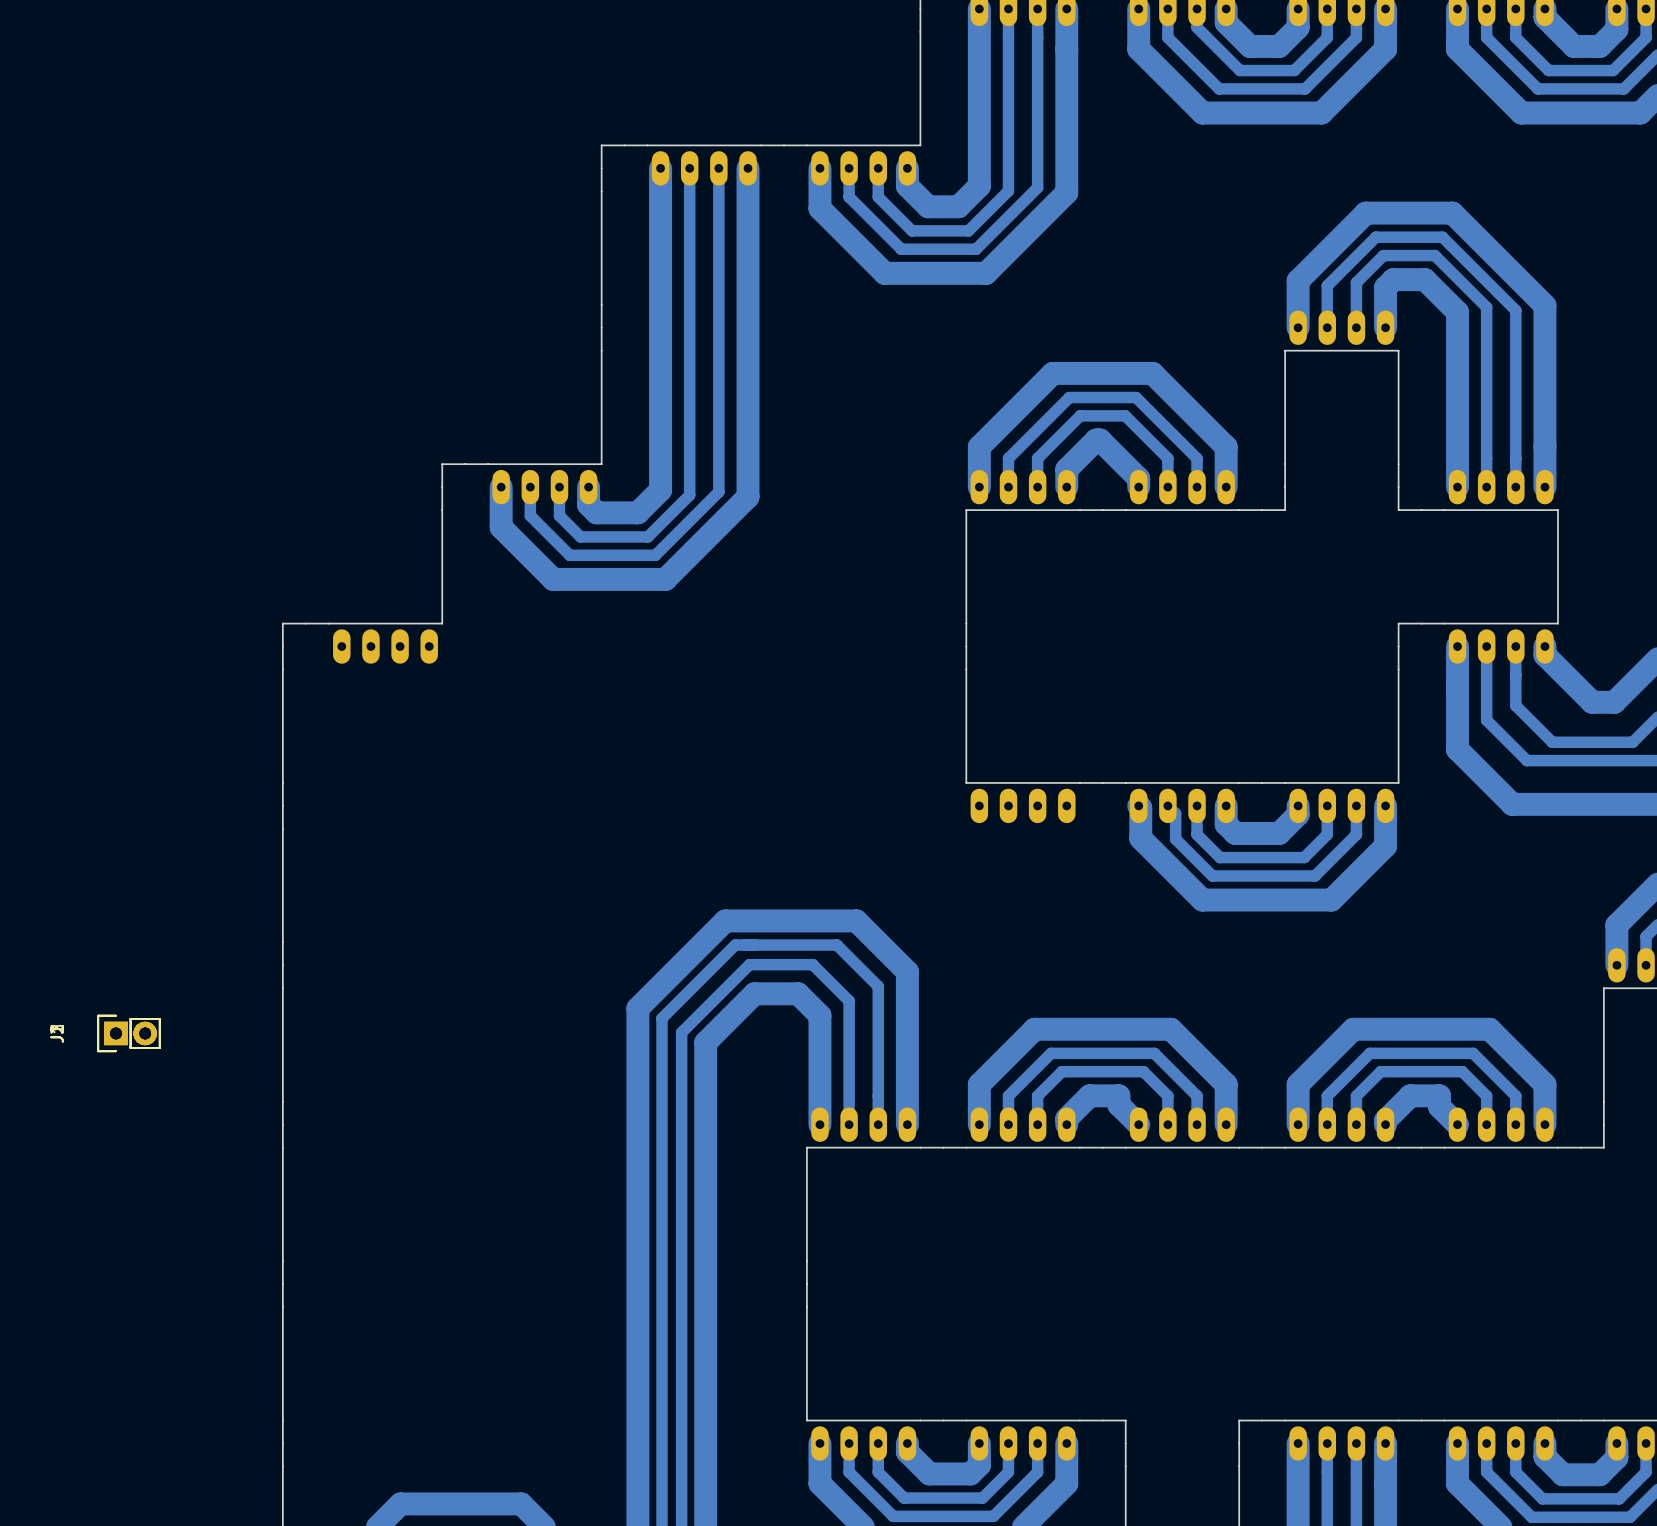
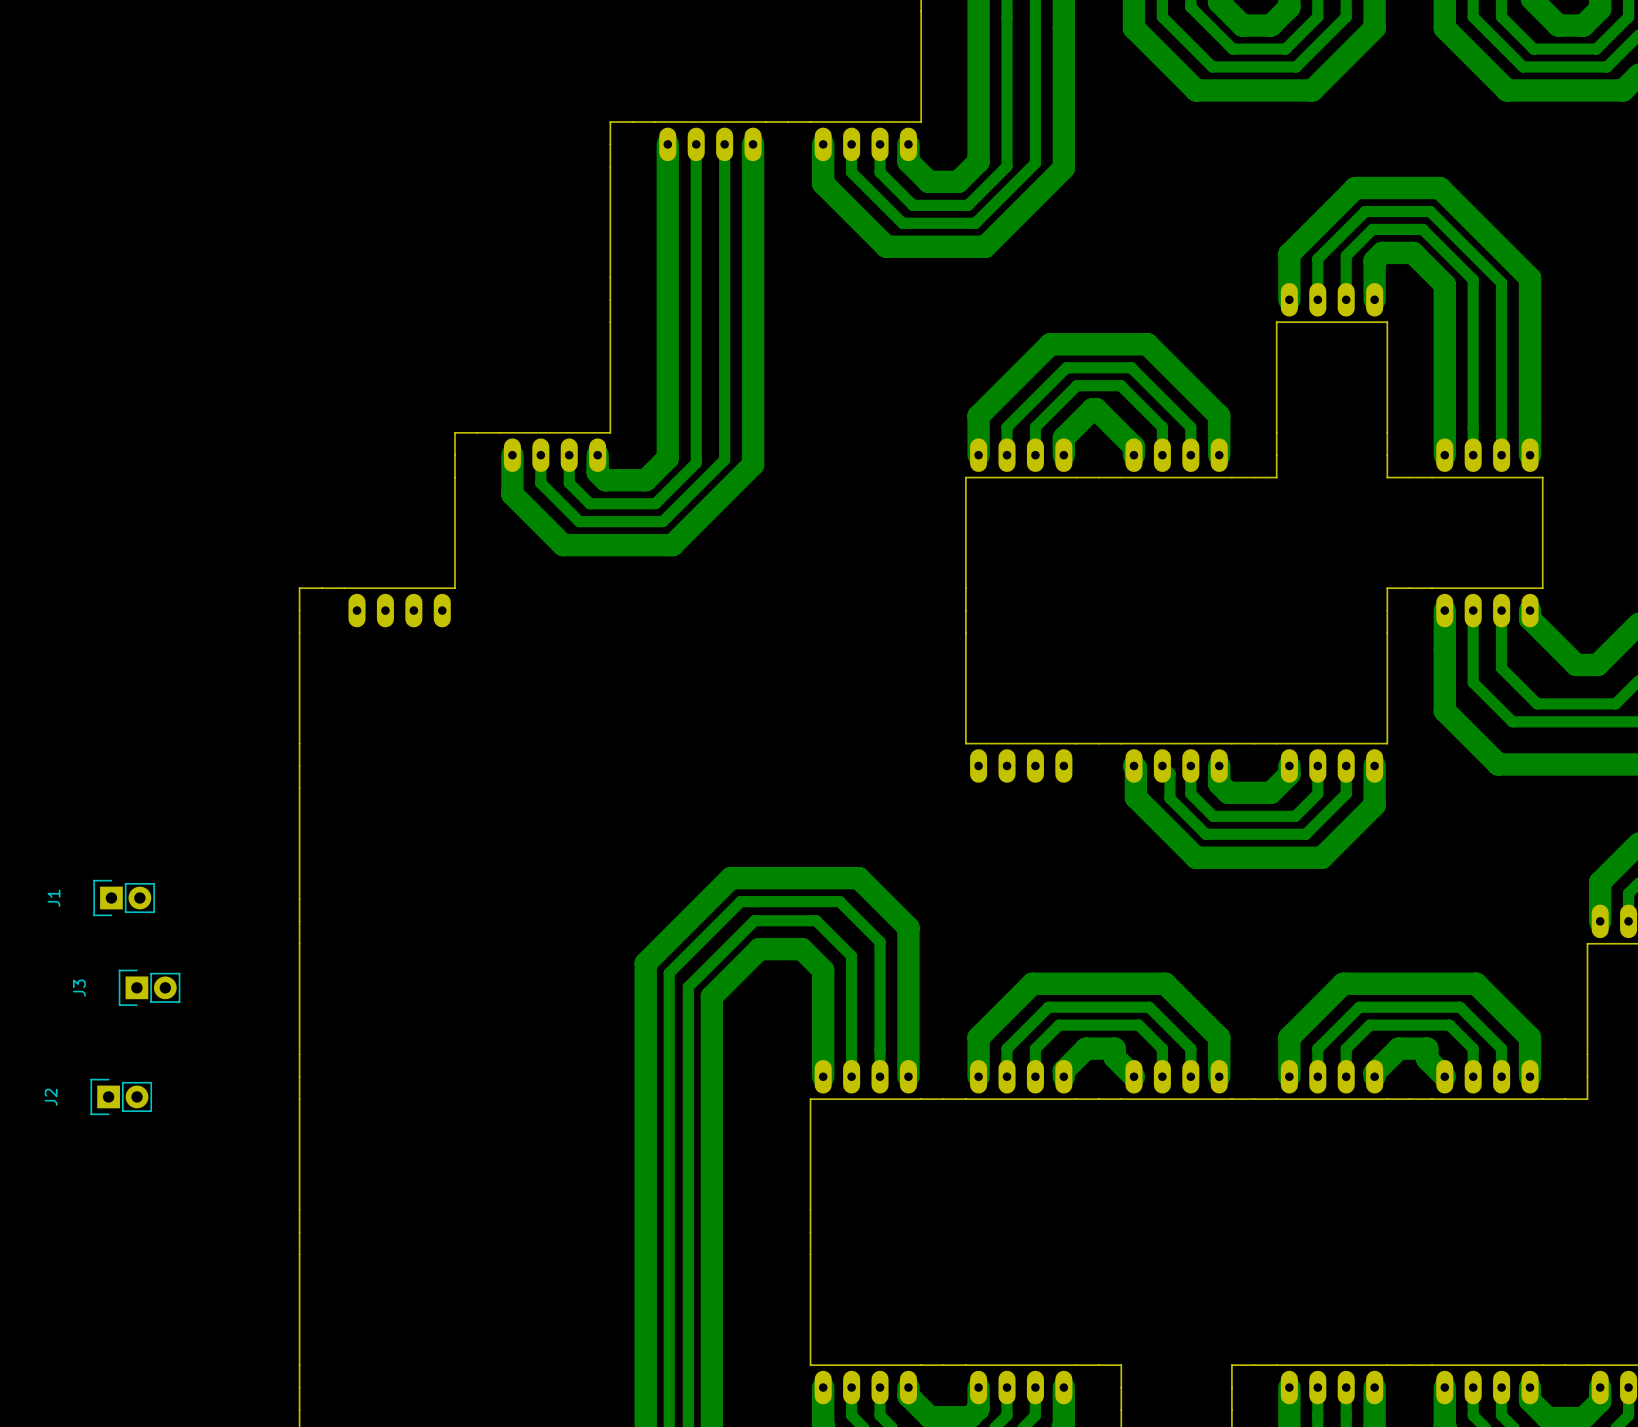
J1 position: (128, 1033) -> (124, 898)
J2 position: (128, 1033) -> (121, 1096)

